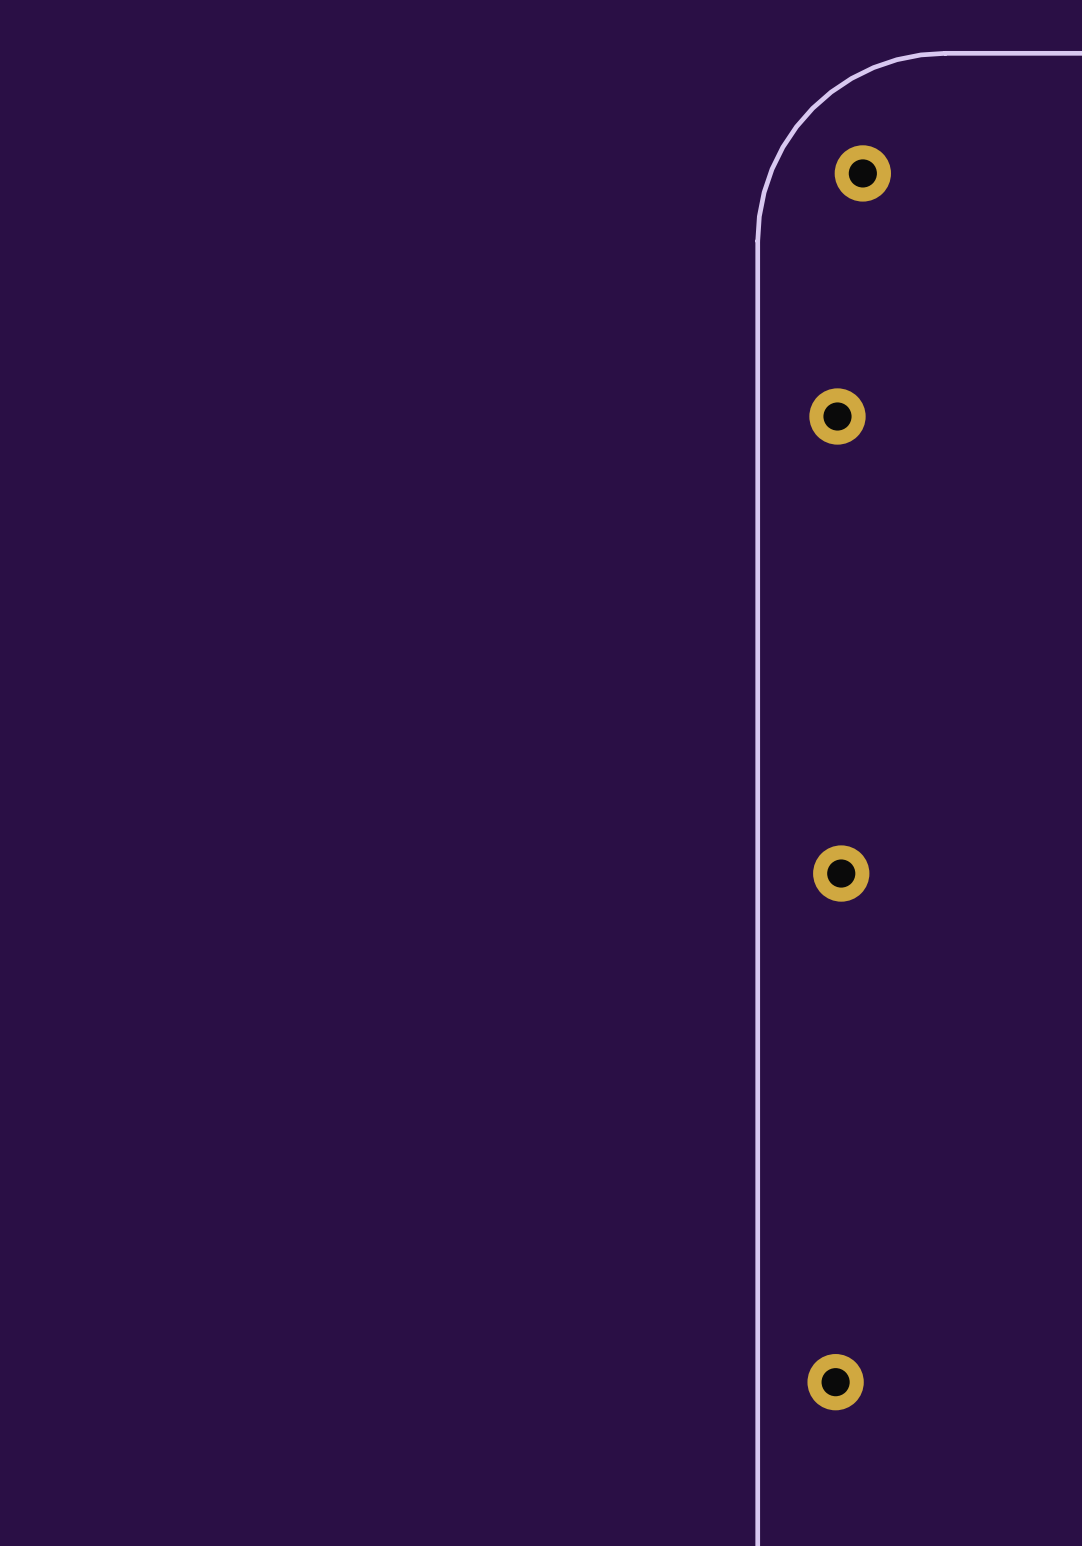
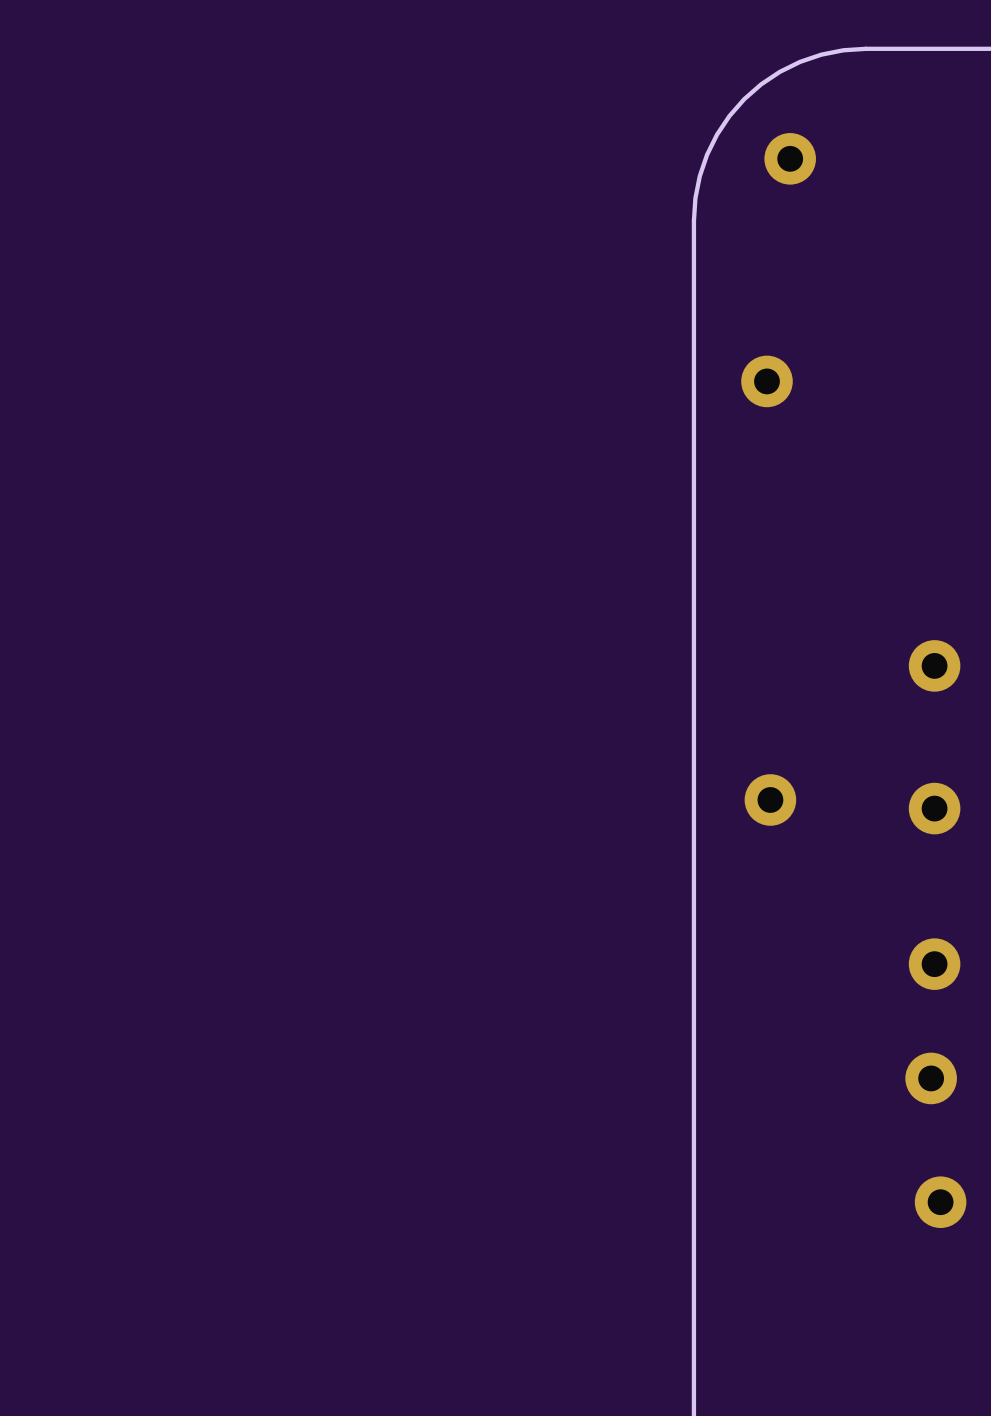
via: none -> (934, 665)
via: none -> (934, 808)
via: none -> (934, 964)
via: none -> (931, 1078)
via: none -> (940, 1202)
via: (835, 1382) -> none

